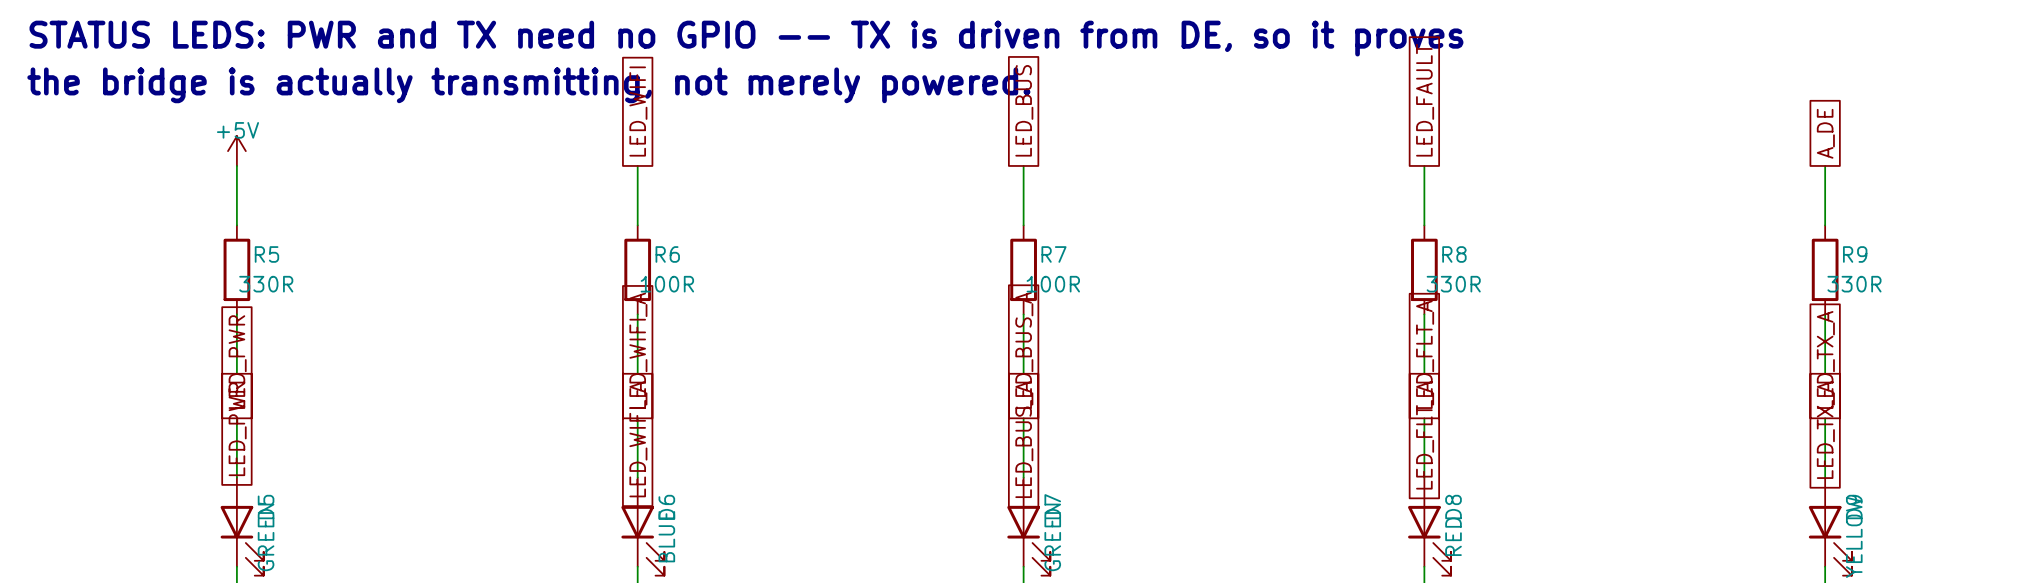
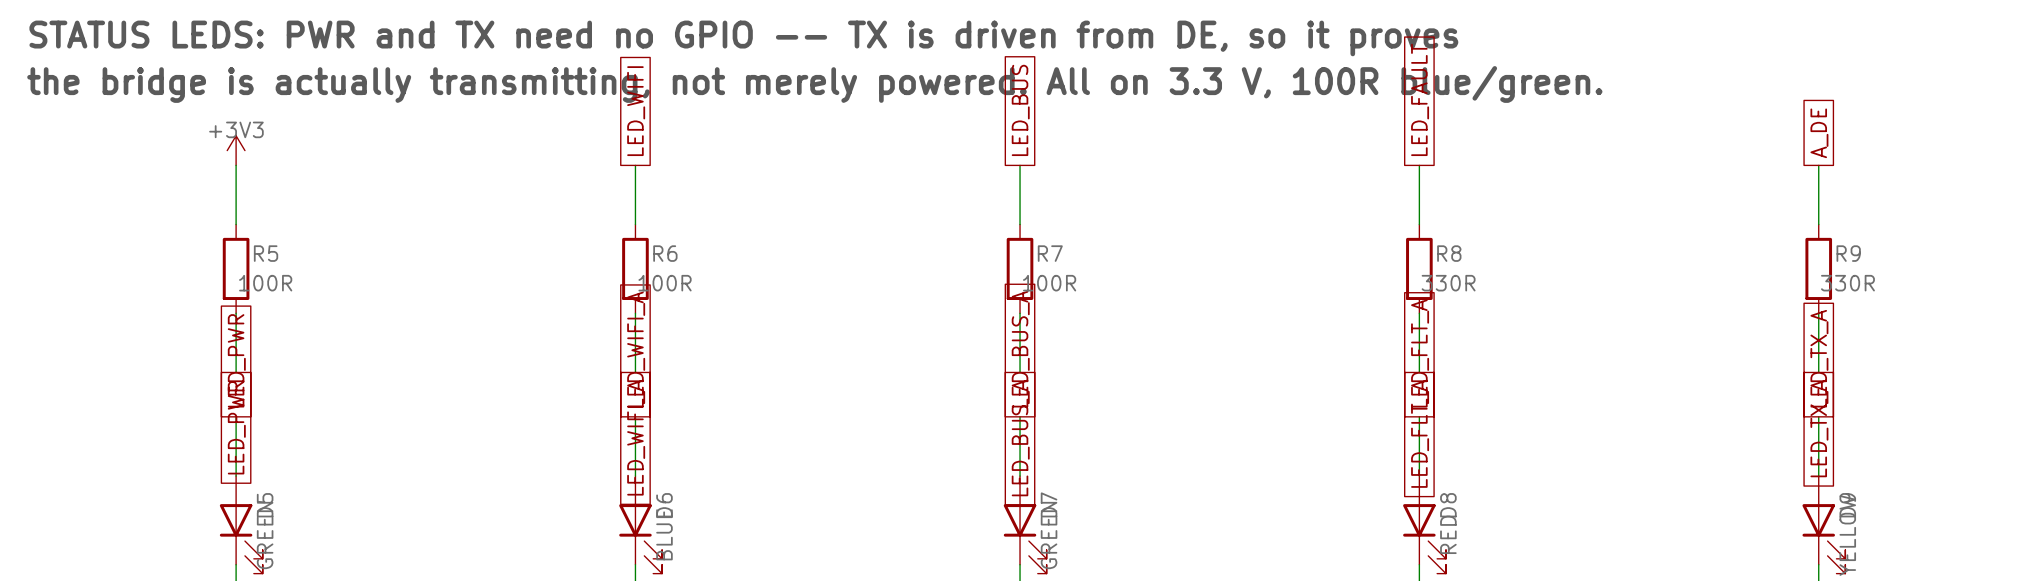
text: the bridge is actually transmitting, not merely powered. (528, 85) -> the bridge is actually transmitting, not merely powered. All on 3.3 V, 100R blue/green. (814, 84)
power symbol: +5V (236, 151) -> +3V3 (236, 150)
R5 value: 330R (266, 284) -> 100R (265, 283)

